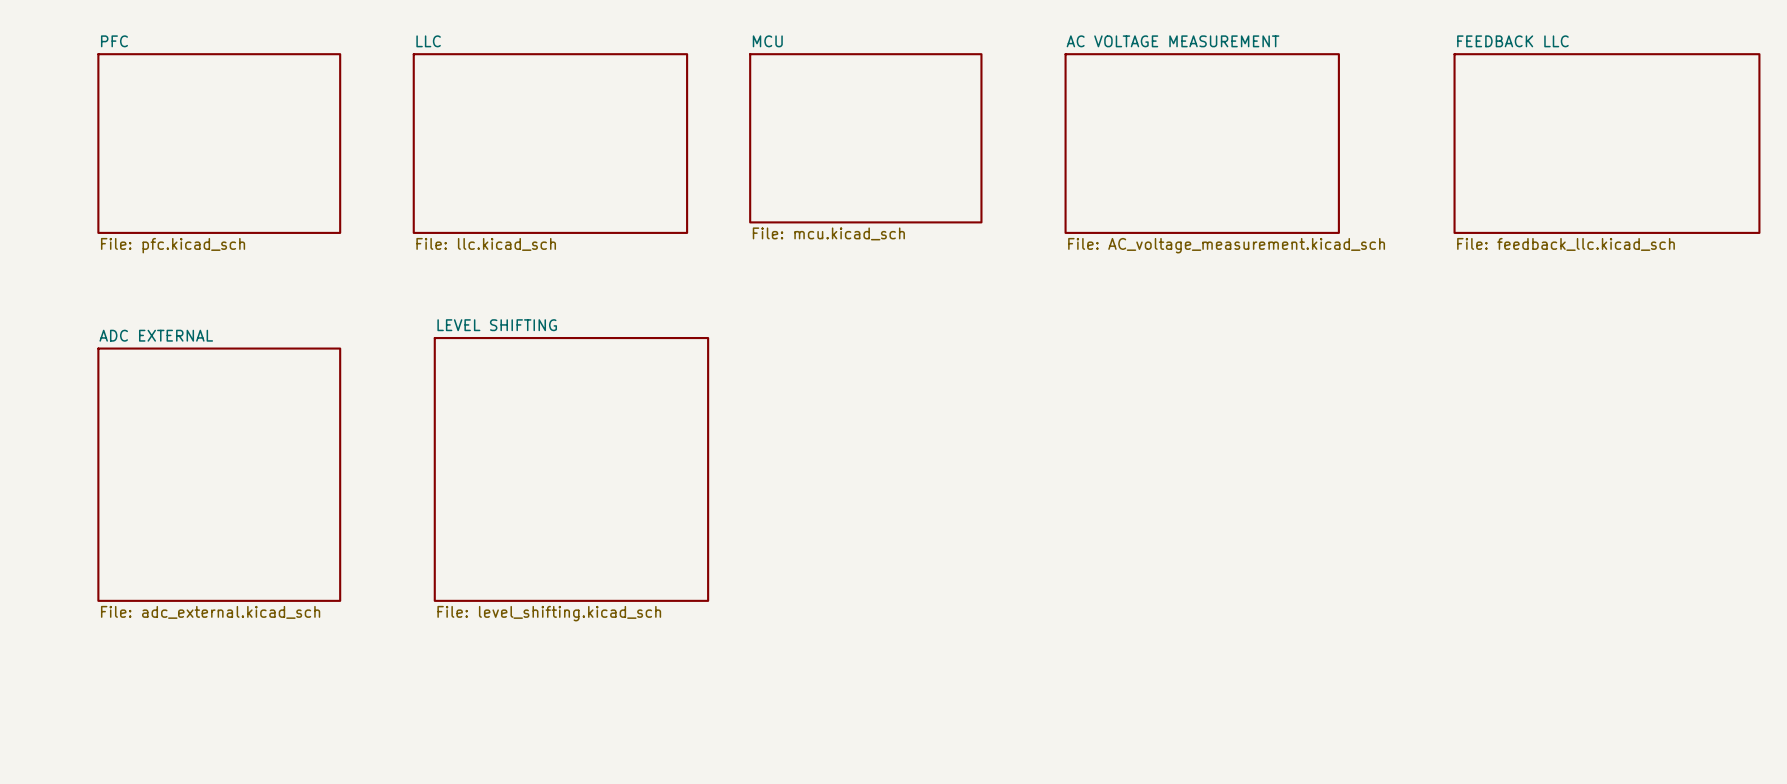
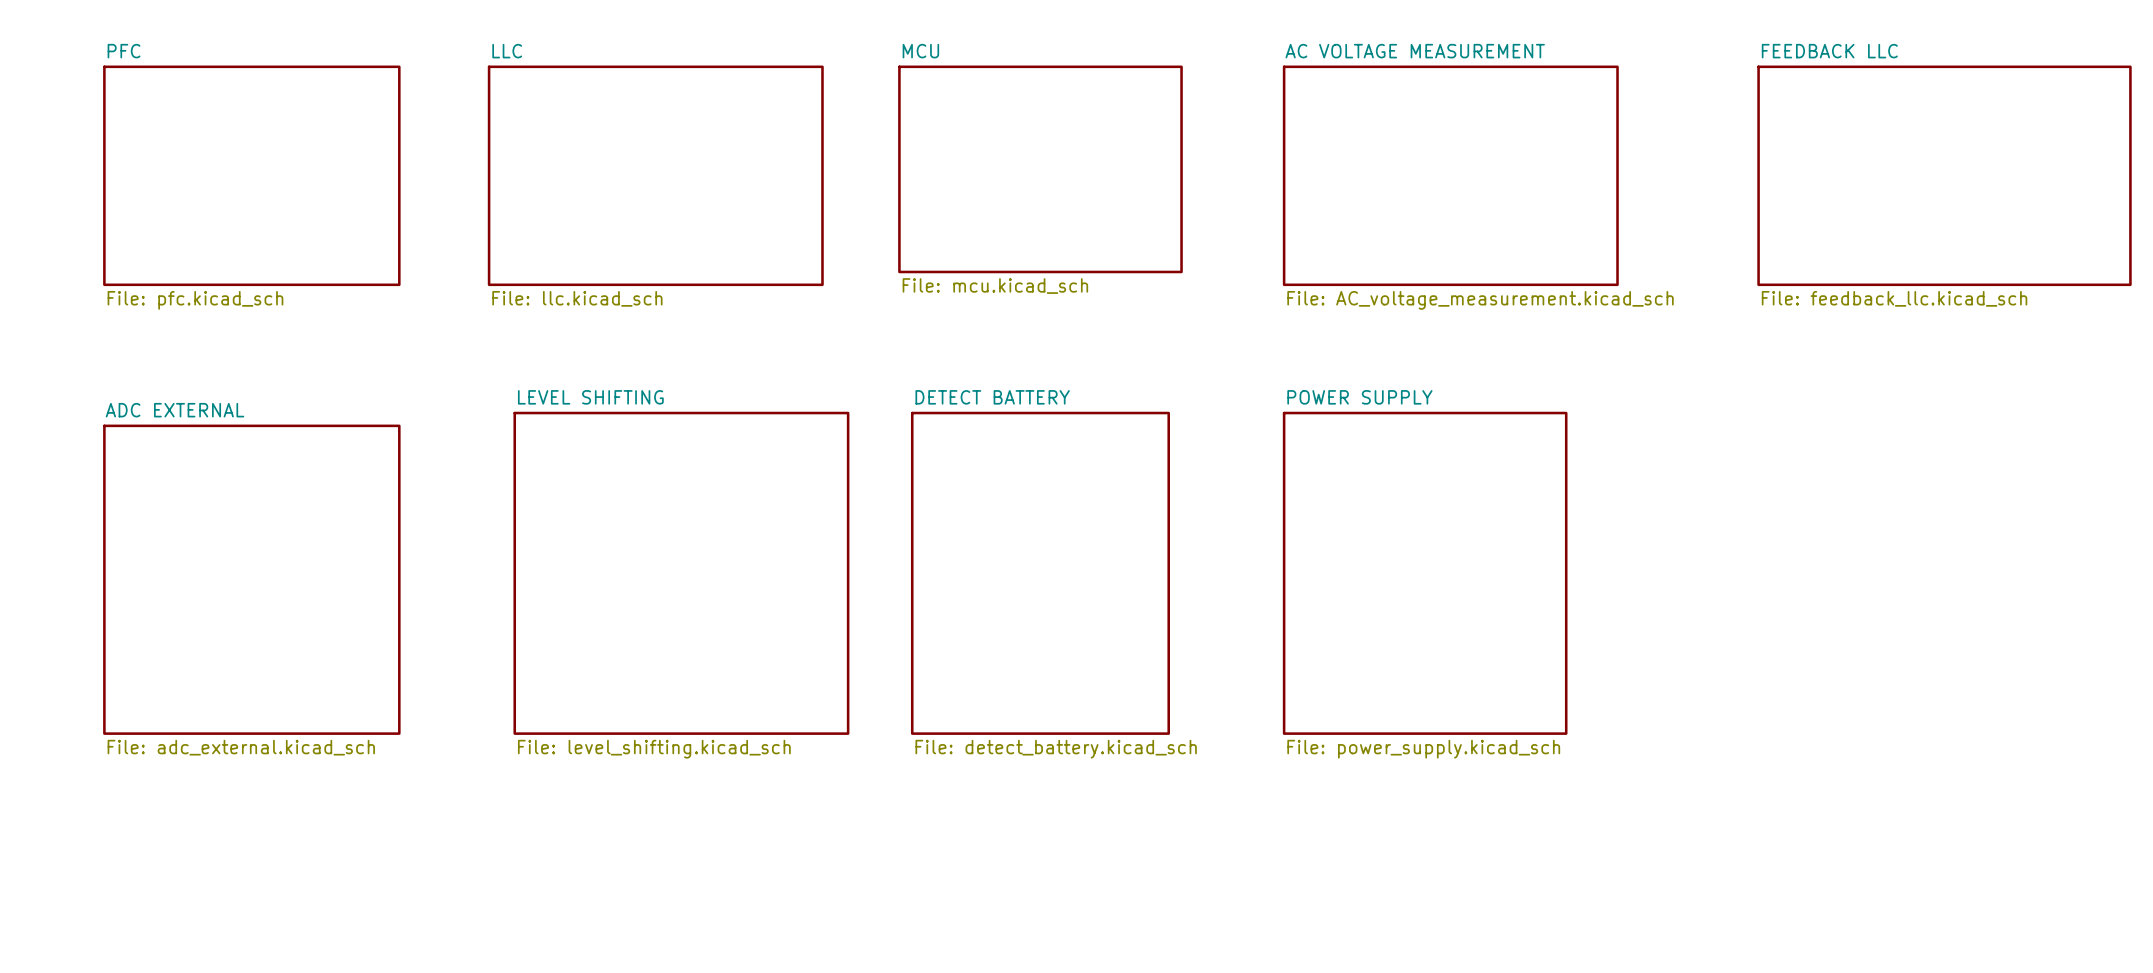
sheet DETECT BATTERY: none -> File: detect_battery.kicad_sch (1040, 573)
sheet POWER SUPPLY: none -> File: power_supply.kicad_sch (1425, 573)

